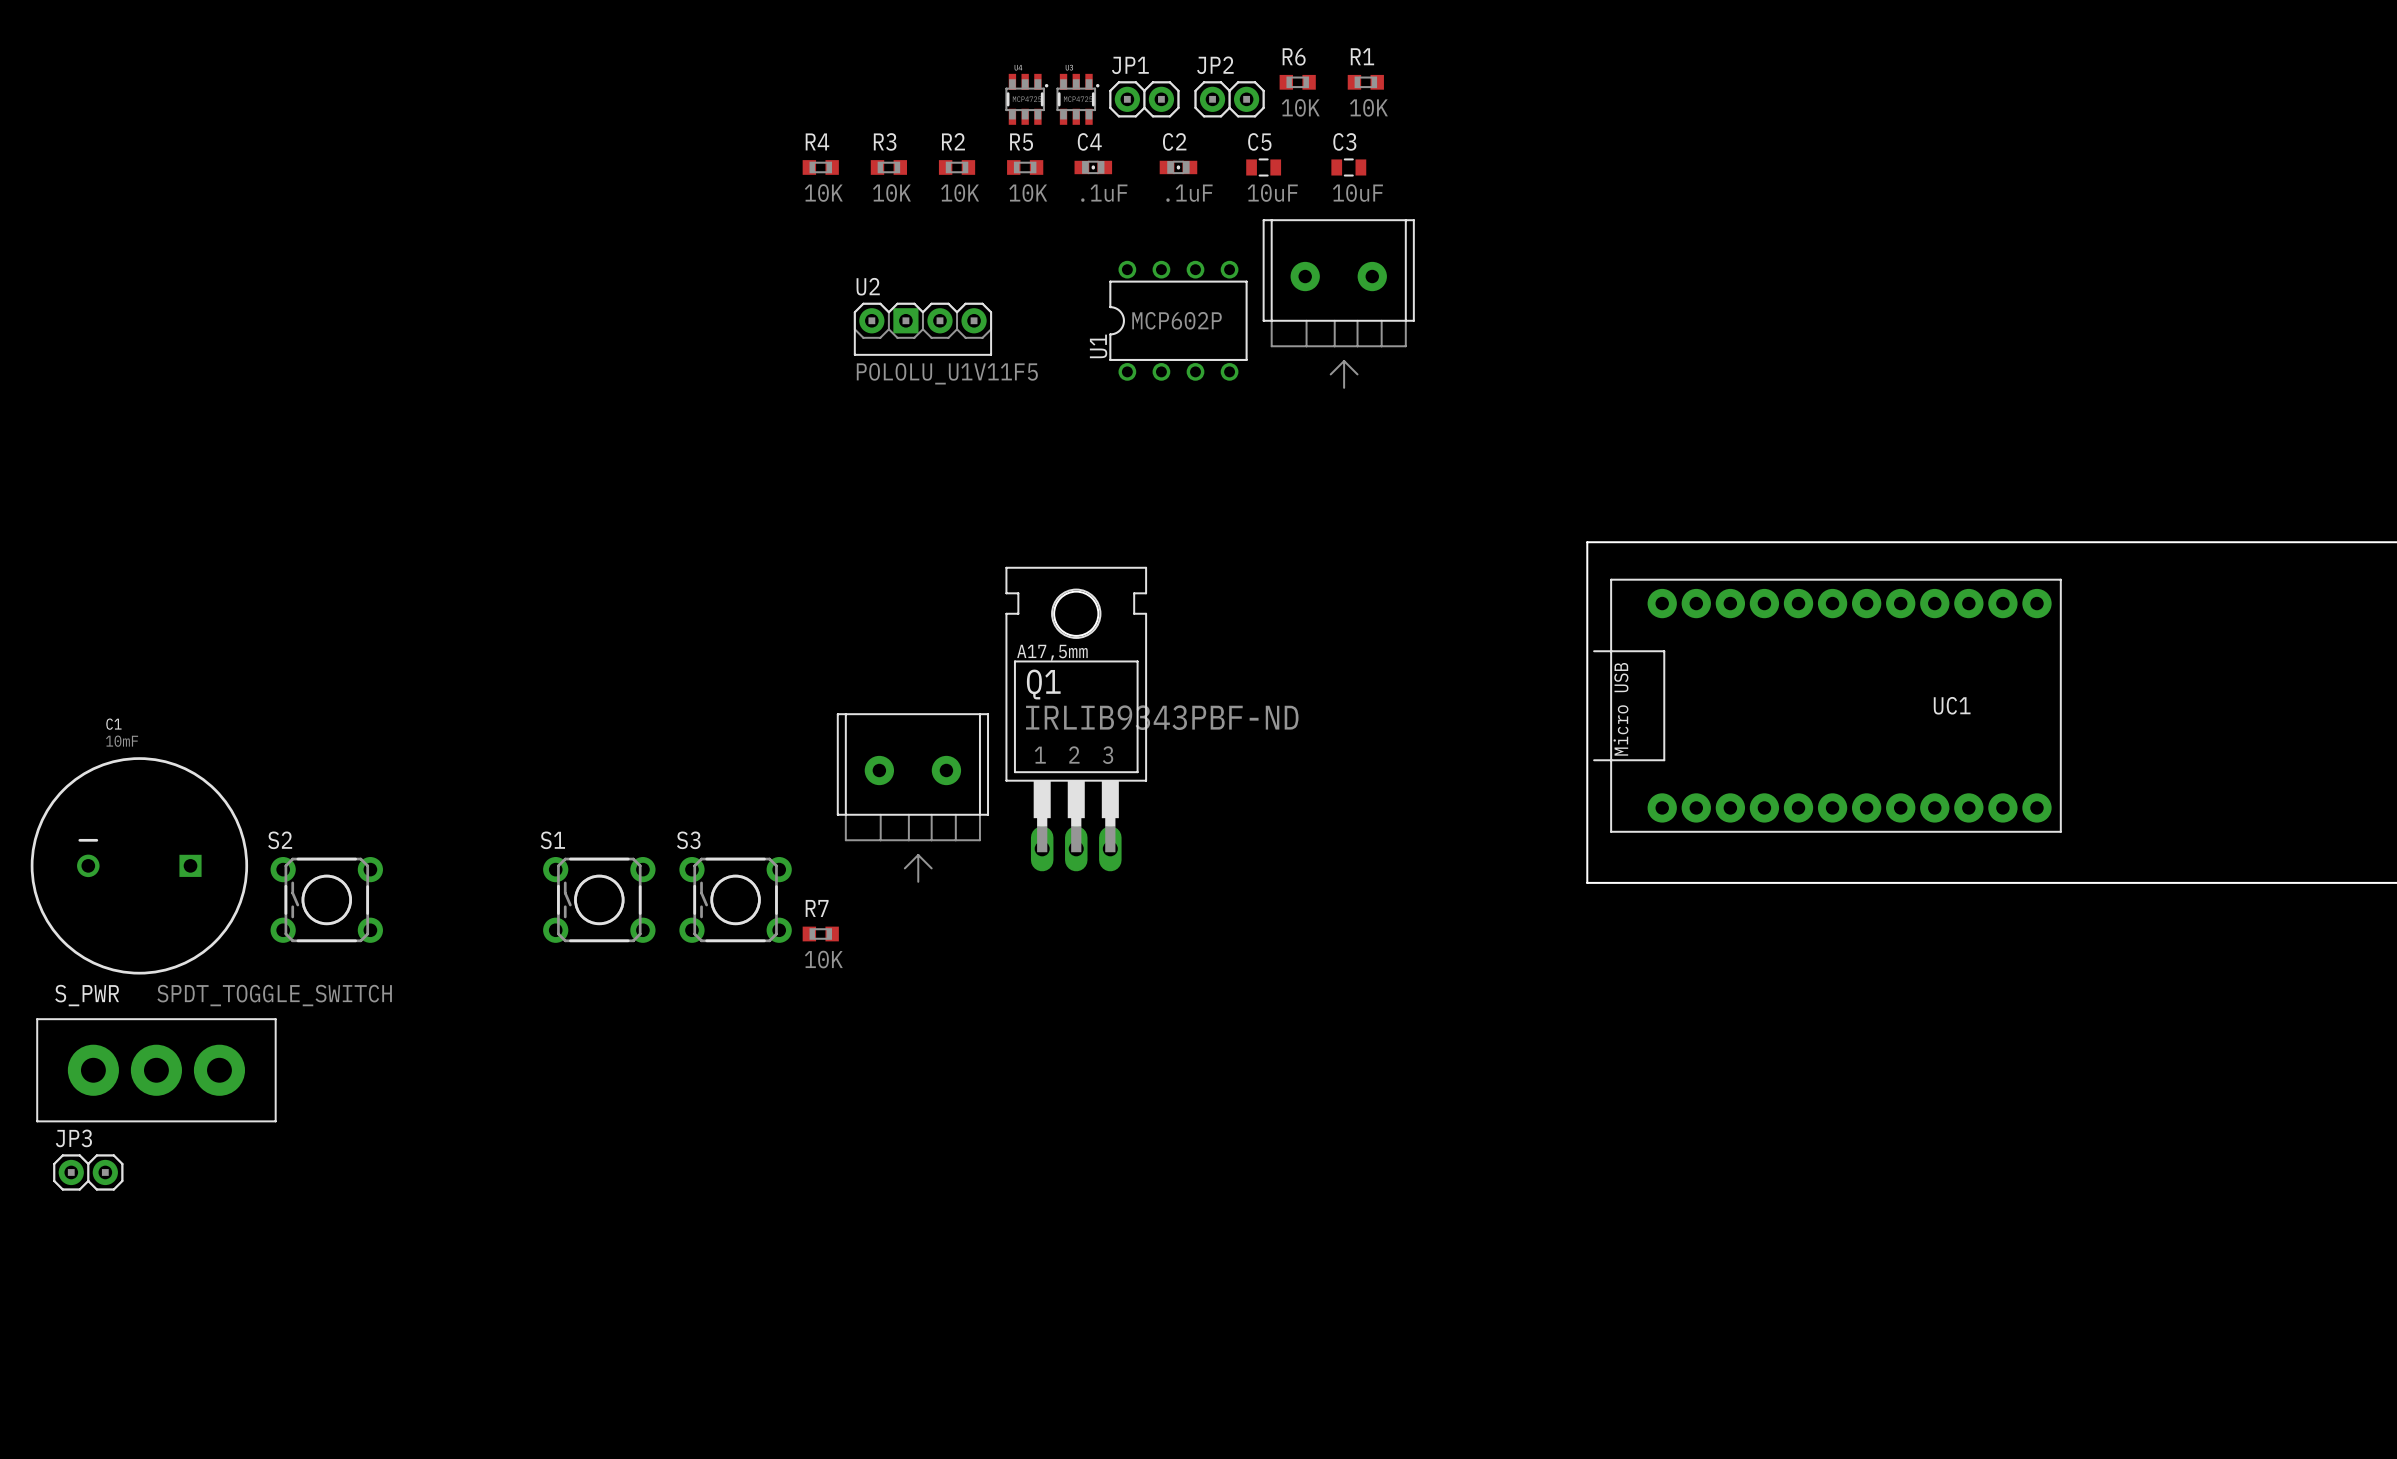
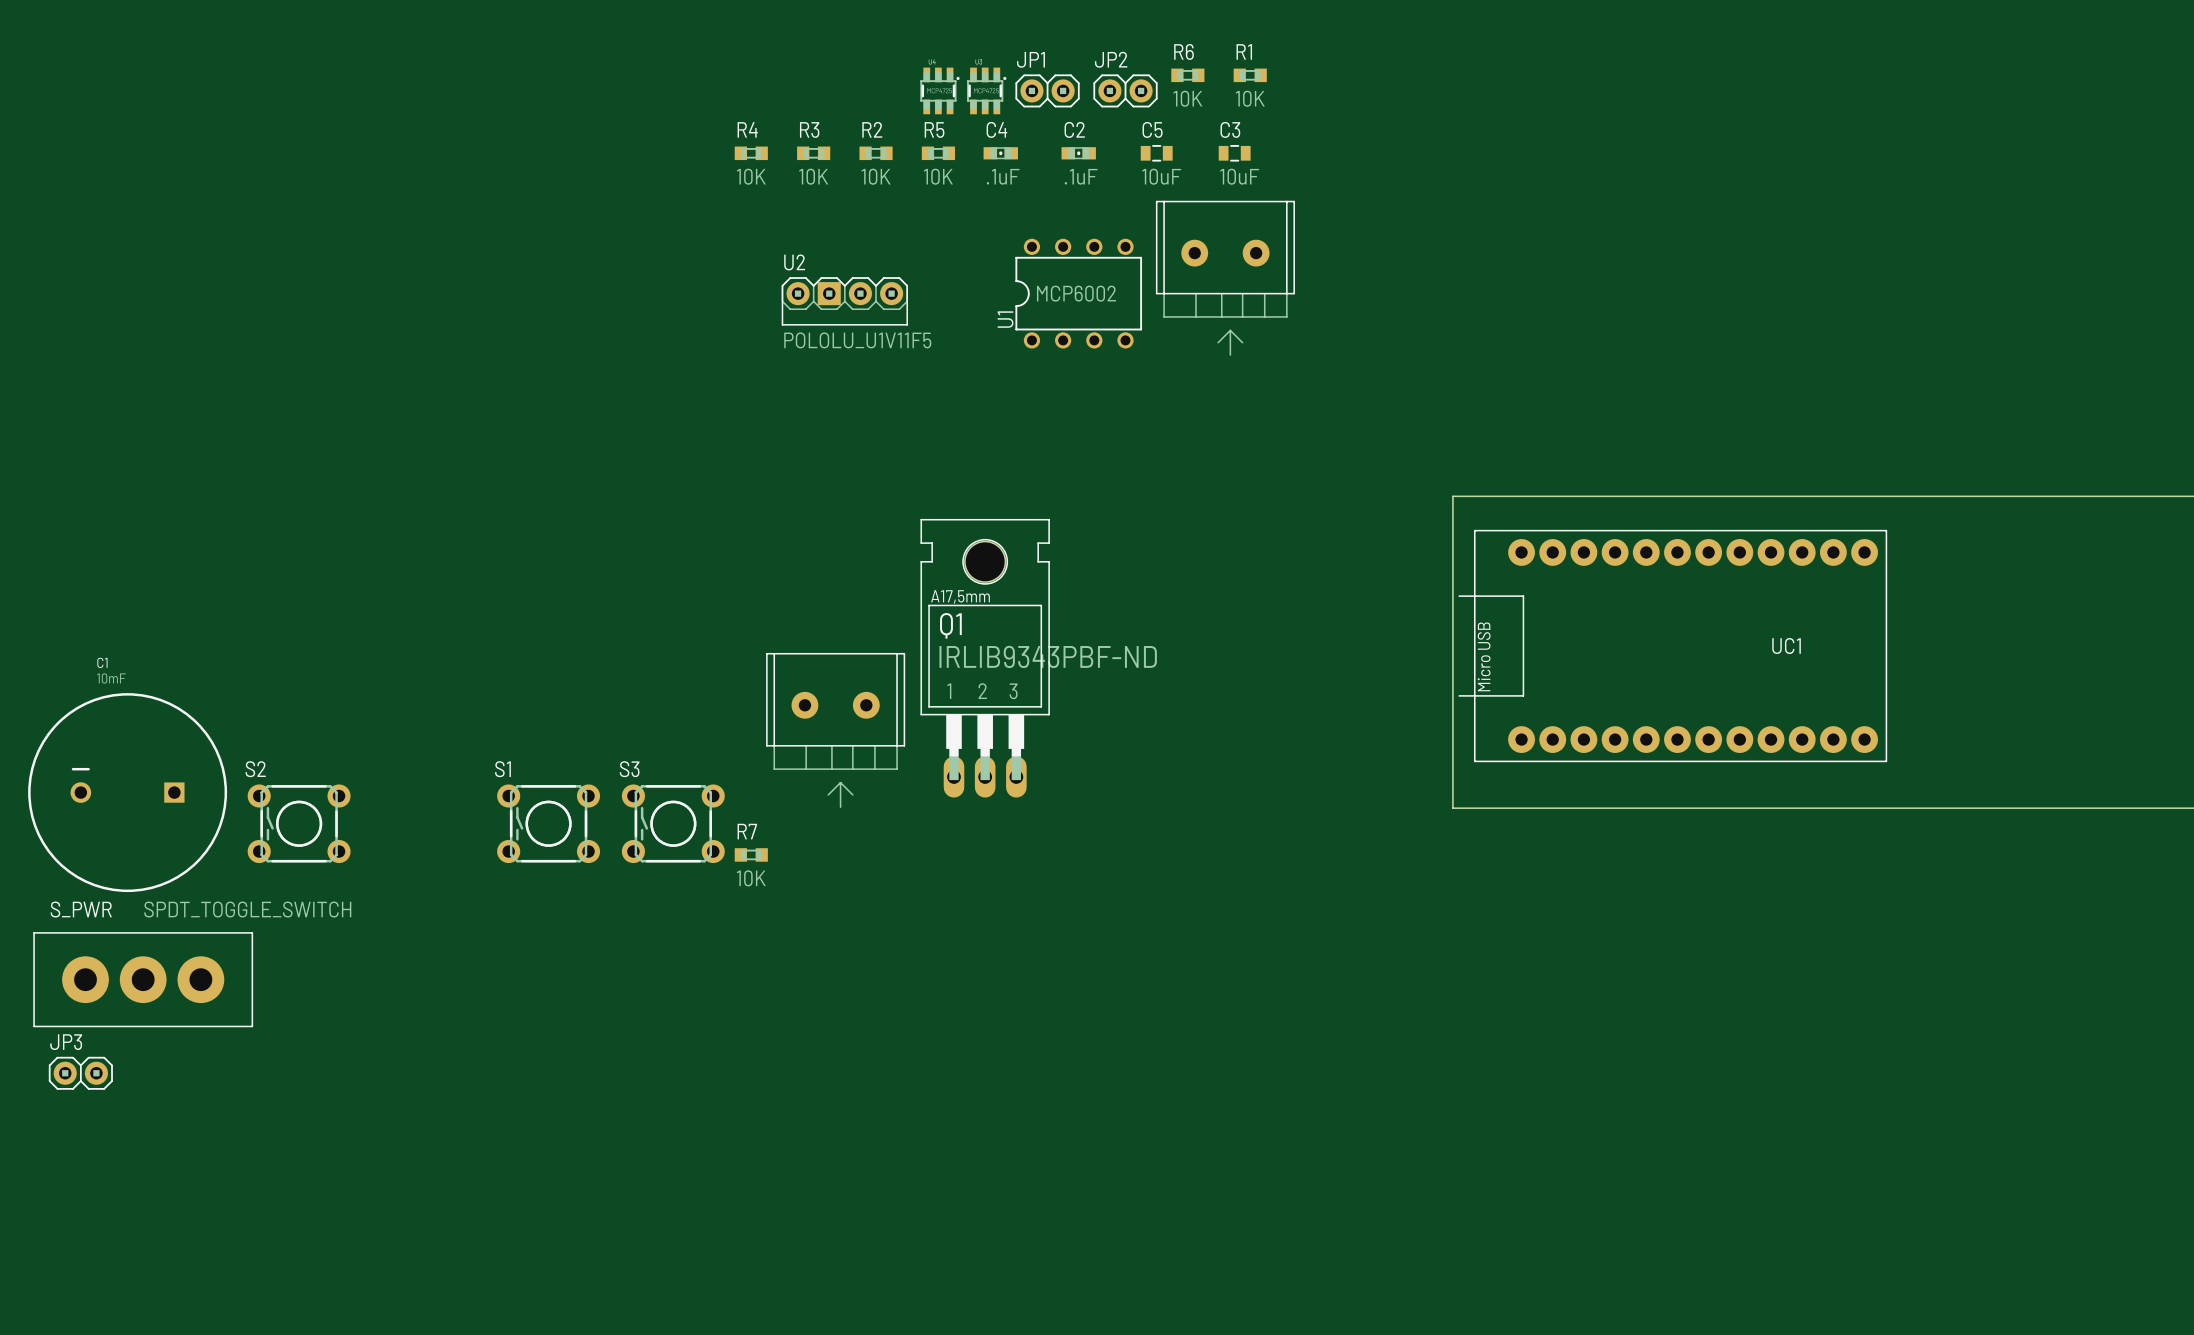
U1 value: MCP602P (1177, 320) -> MCP6002 (1076, 293)

